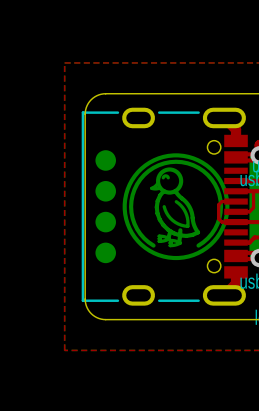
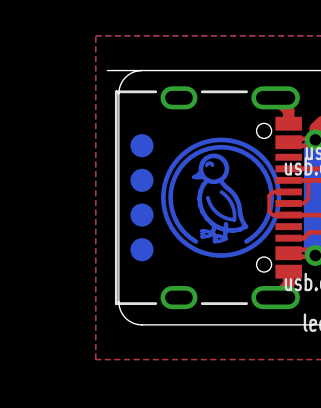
board edge: none -> (107, 70) (141, 70)

